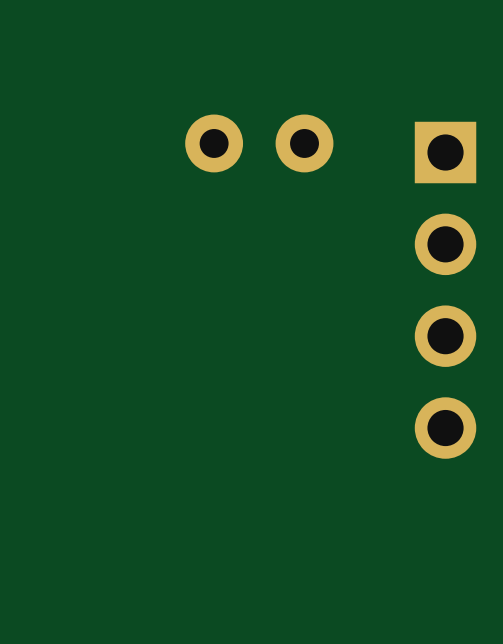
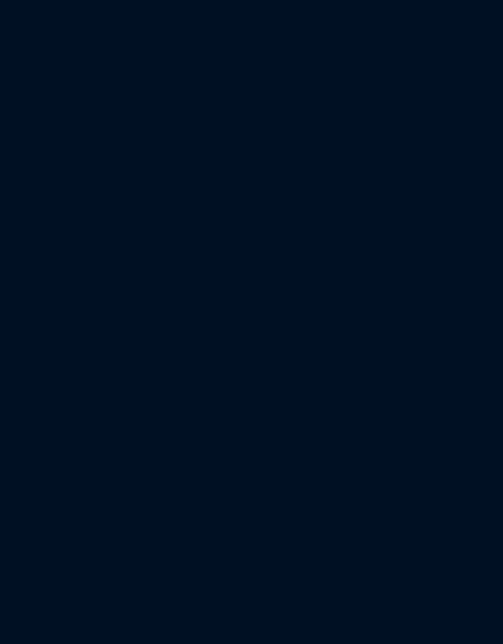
part: (259, 143) -> none
part: (445, 290) -> none

